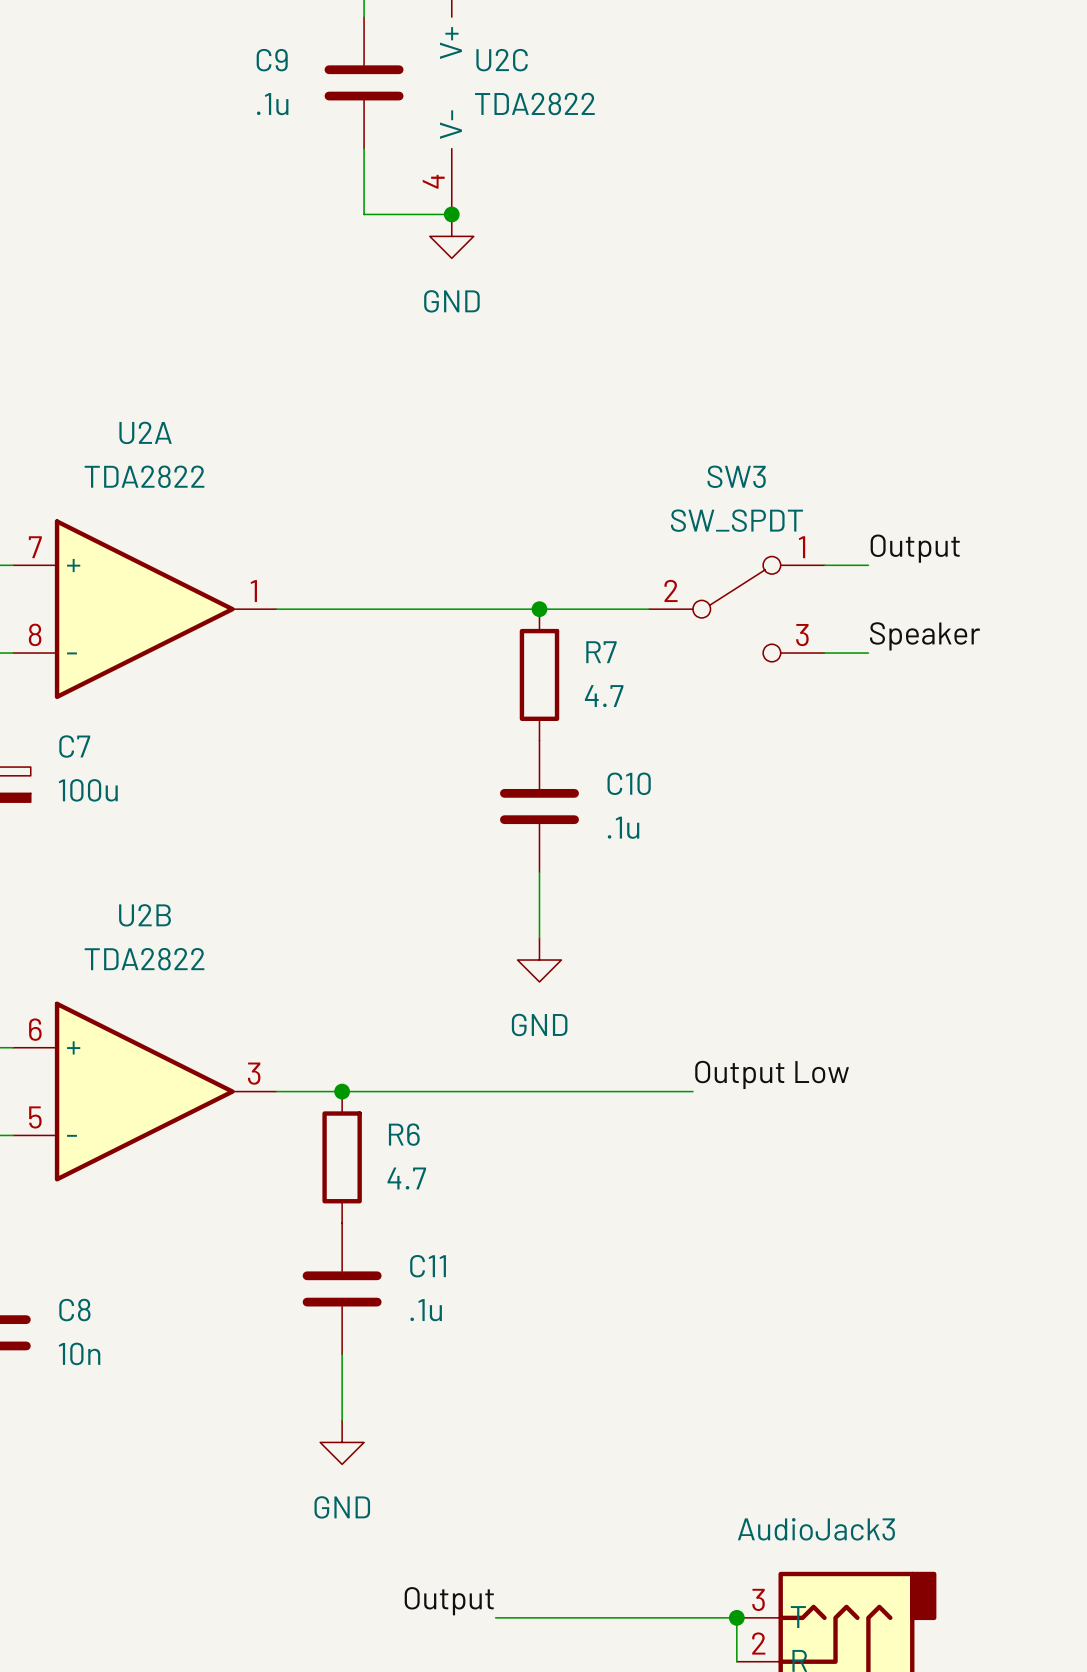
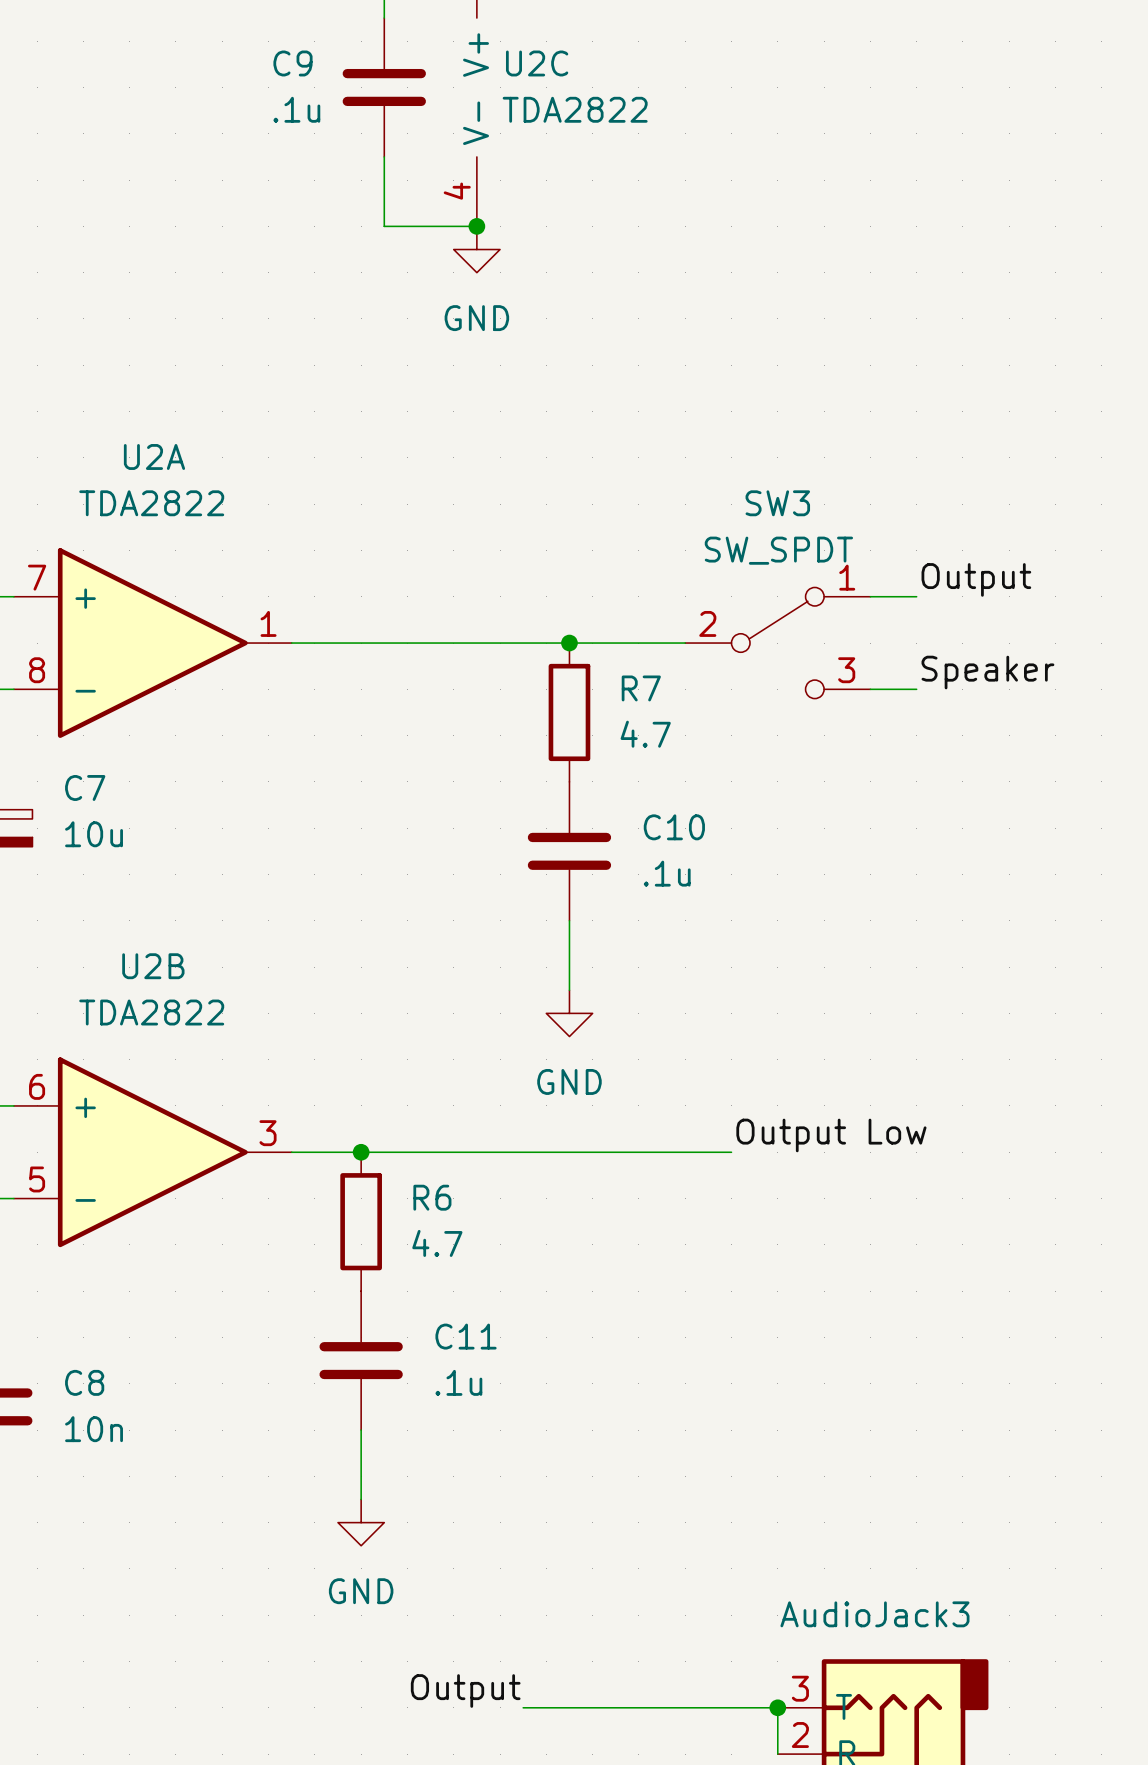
C7 value: 100u (88, 790) -> 10u (94, 834)

